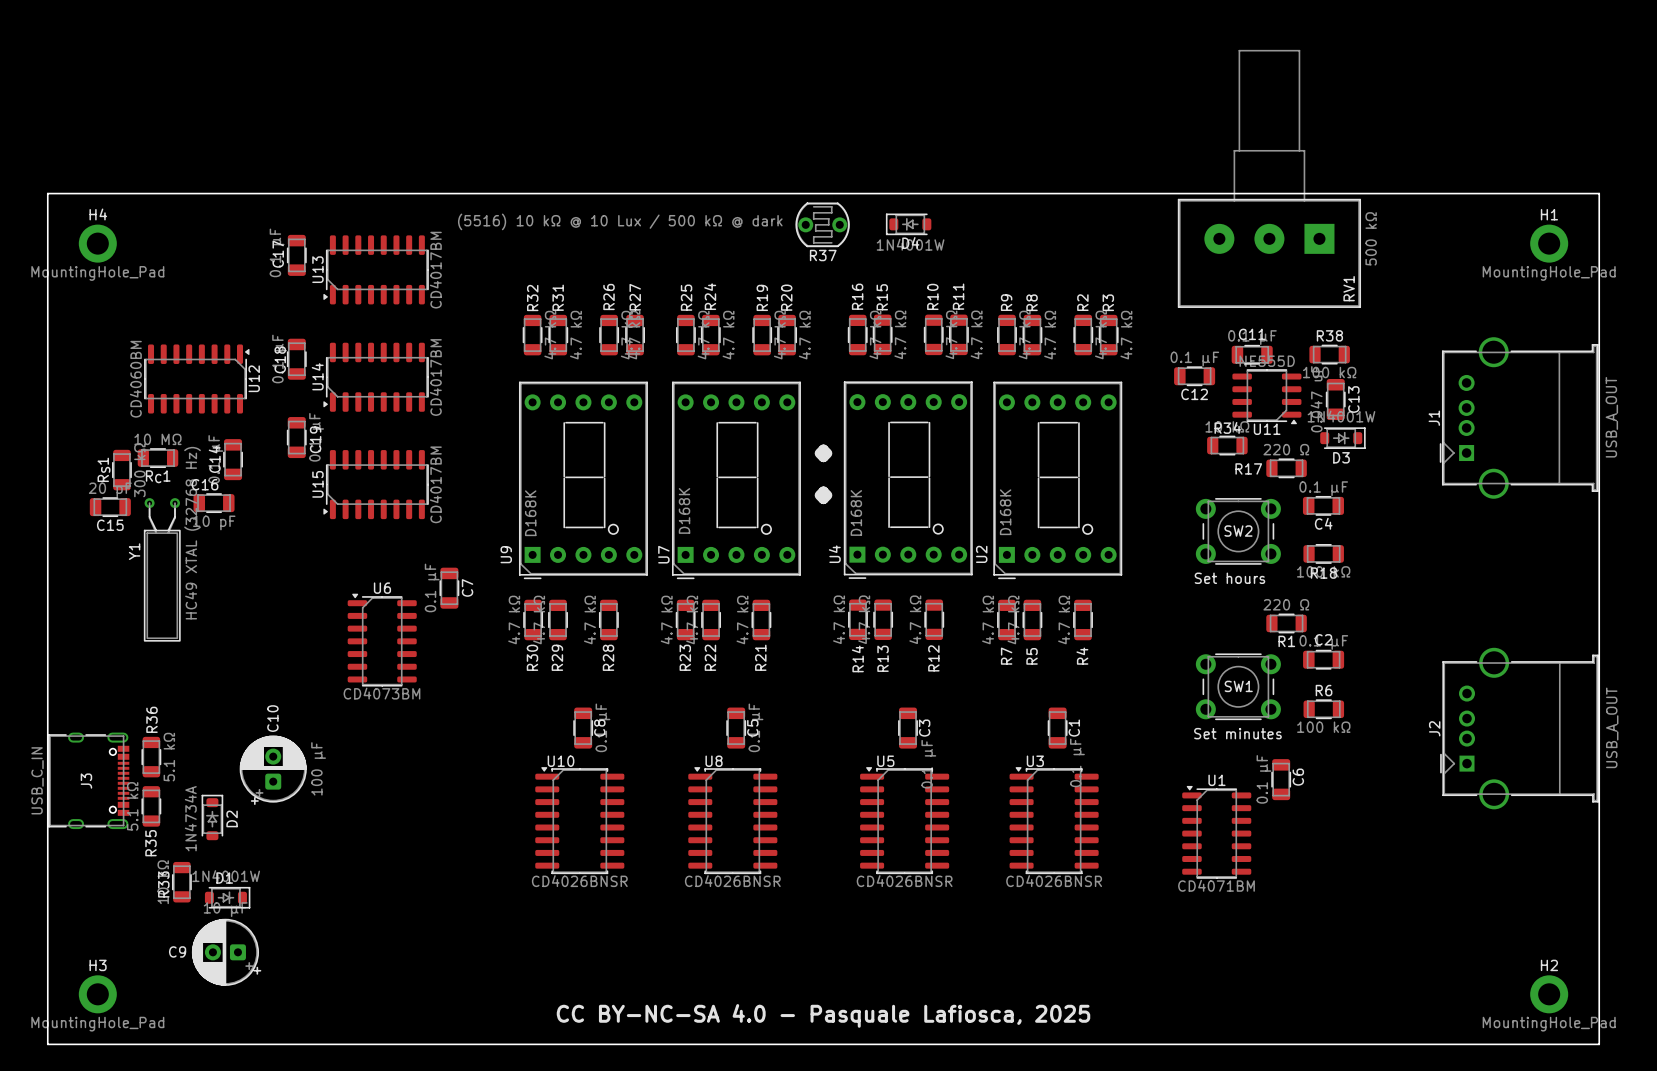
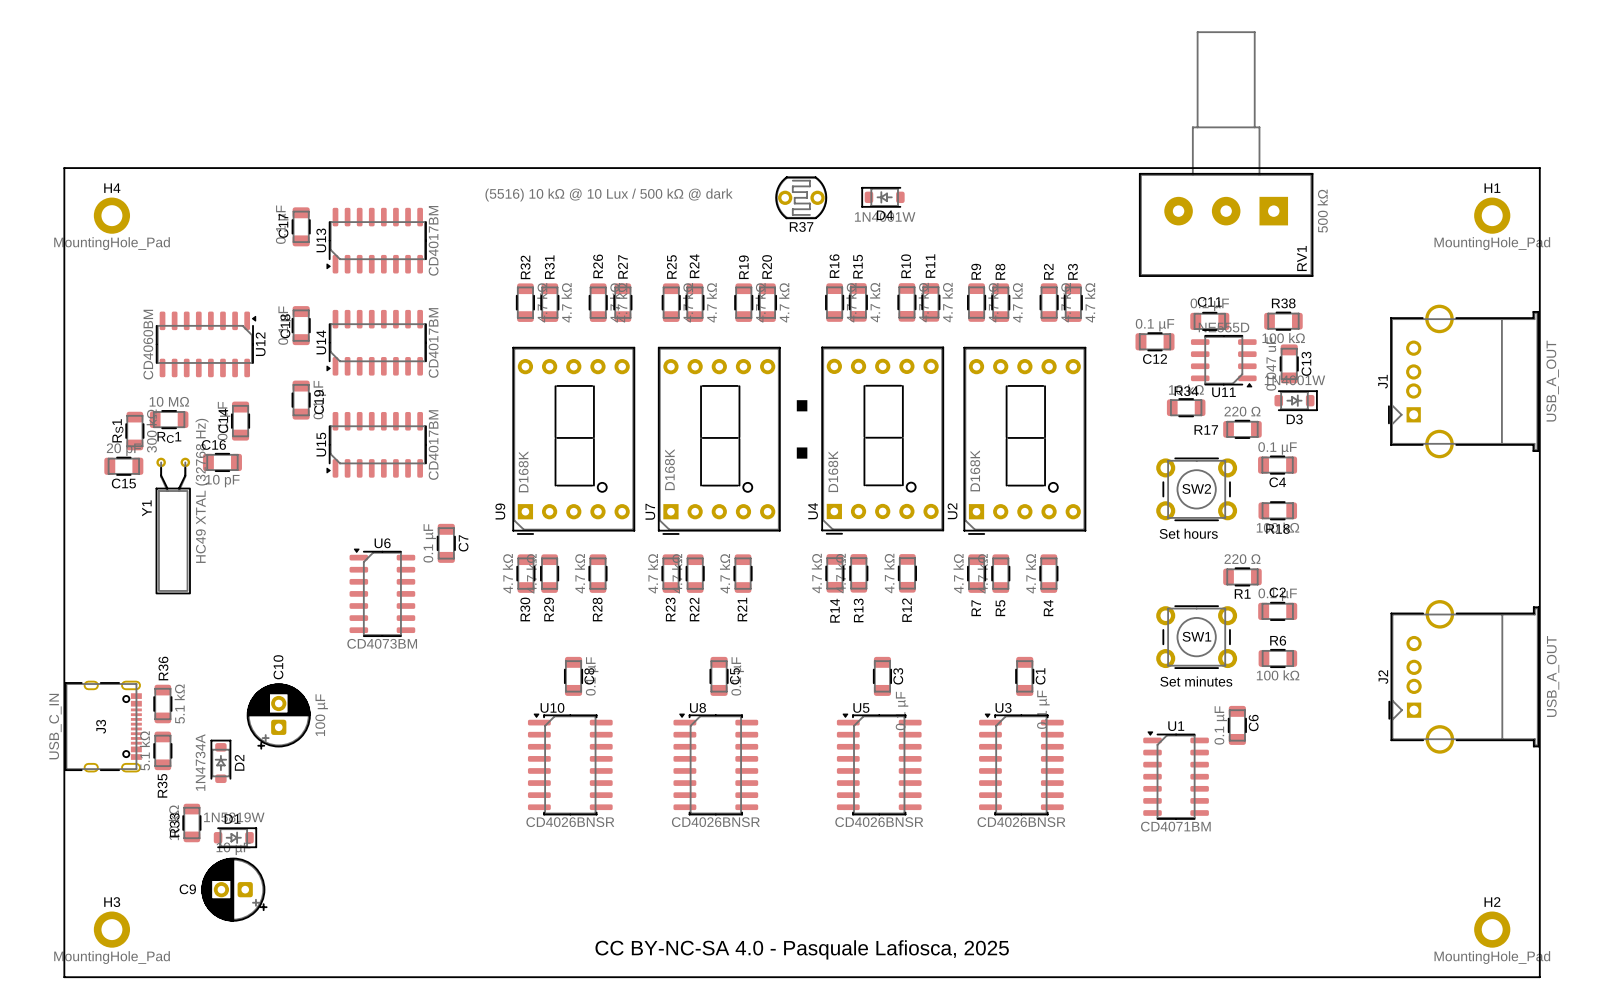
D1 value: 1N4001W (226, 876) -> 1N5819W (234, 817)

